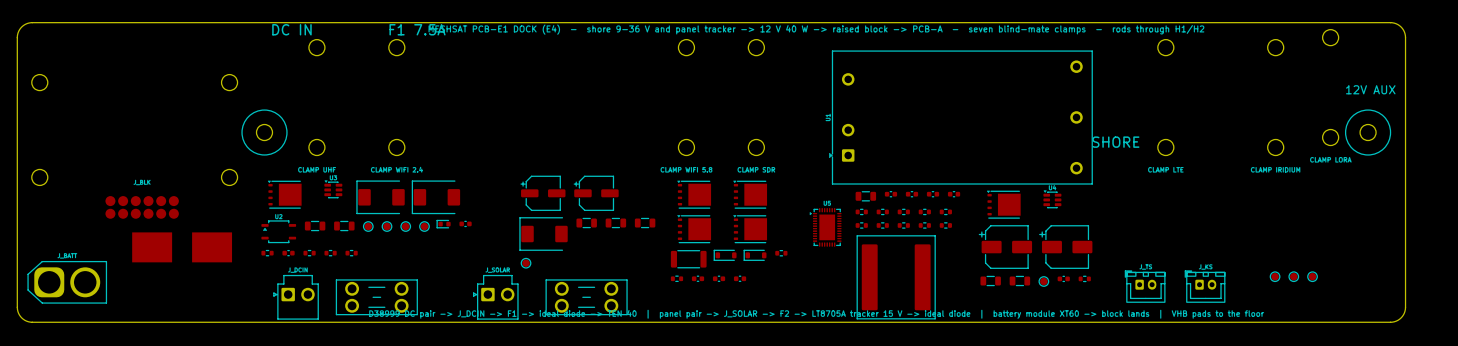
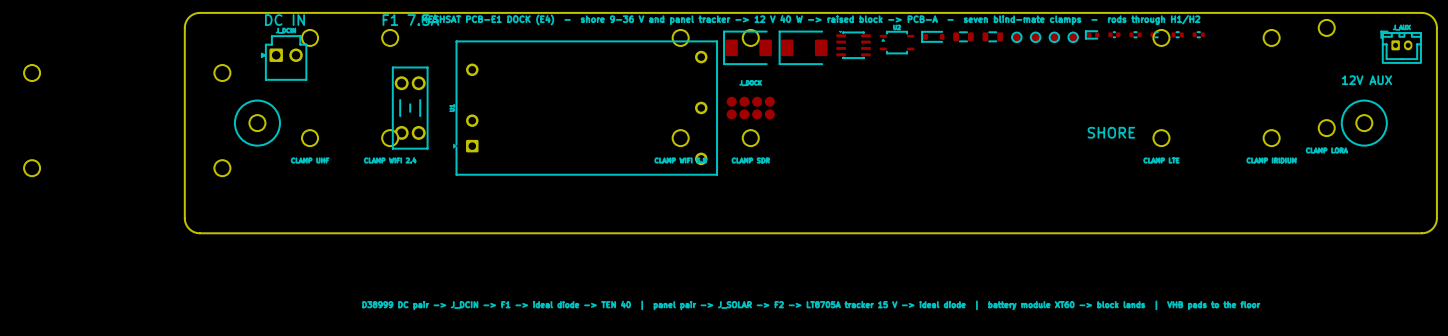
board edge: (207, 22) (32, 22) (24, 24) (19, 29) (17, 37) (17, 307) (19, 314) (24, 320) (32, 322) (1394, 321) (1402, 316) (1405, 307) (1405, 37) (1401, 27) (1390, 22) -> (199, 12) (189, 17) (184, 27) (184, 218) (187, 227) (197, 233) (1423, 233) (1432, 228) (1436, 218) (1436, 25) (1432, 17) (1425, 13) (1386, 12)
part: none -> (1092, 34)
part: none -> (1114, 34)
part: none -> (1135, 34)
part: none -> (1156, 34)
part: none -> (1177, 34)
part: none -> (1198, 34)
part: none -> (933, 36)
part: none -> (963, 36)
part: none -> (992, 36)
part: none -> (1016, 37)
part: none -> (1035, 37)
part: none -> (1054, 37)
part: none -> (1073, 37)
part: none -> (853, 44)
part: none -> (1401, 47)
part: none -> (747, 47)
part: none -> (803, 47)
part: none -> (284, 57)
part: none -> (410, 108)
part: none -> (750, 108)
part position: (960, 117) -> (585, 108)
part: (333, 189) -> none
part: (543, 193) -> none
part: (596, 193) -> none
part: (284, 194) -> none
part: (694, 194) -> none
part: (750, 194) -> none
part: (890, 194) -> none
part: (911, 194) -> none
part: (933, 194) -> none
part: (954, 194) -> none
part: (865, 196) -> none
part: (380, 197) -> none
part: (436, 197) -> none
part: (1052, 199) -> none
part: (1003, 204) -> none
part: (142, 207) -> none
part: (861, 211) -> none
part: (882, 211) -> none
part: (903, 211) -> none
part: (924, 211) -> none
part: (945, 211) -> none
part: (465, 223) -> none
part: (586, 223) -> none
part: (615, 223) -> none
part: (645, 223) -> none
part: (443, 224) -> none
part: (861, 225) -> none
part: (882, 225) -> none
part: (903, 225) -> none
part: (924, 225) -> none
part: (945, 225) -> none
part: (315, 226) -> none
part: (344, 226) -> none
part: (368, 226) -> none
part: (387, 226) -> none
part: (405, 226) -> none
part: (424, 226) -> none
part: (825, 227) -> none
part: (694, 229) -> none
part: (750, 229) -> none
part position: (278, 231) -> (897, 42)
part: (543, 234) -> none
part: (152, 247) -> none
part: (212, 247) -> none
part: (1005, 247) -> none
part: (1065, 247) -> none
part: (267, 253) -> none
part: (288, 253) -> none
part: (309, 253) -> none
part: (330, 253) -> none
part: (351, 253) -> none
part: (781, 253) -> none
part: (725, 255) -> none
part: (755, 255) -> none
part: (688, 259) -> none
part: (526, 263) -> none
part: (1275, 276) -> none
part: (1293, 276) -> none
part: (1312, 276) -> none
part: (896, 277) -> none
part: (676, 278) -> none
part: (698, 278) -> none
part: (719, 278) -> none
part: (740, 278) -> none
part: (1063, 278) -> none
part: (1084, 278) -> none
part: (990, 281) -> none
part: (1019, 281) -> none
part: (1043, 281) -> none
part: (67, 282) -> none
part: (1145, 286) -> none
part: (1205, 286) -> none
part: (296, 297) -> none
part: (376, 297) -> none
part: (495, 297) -> none
part: (586, 297) -> none

